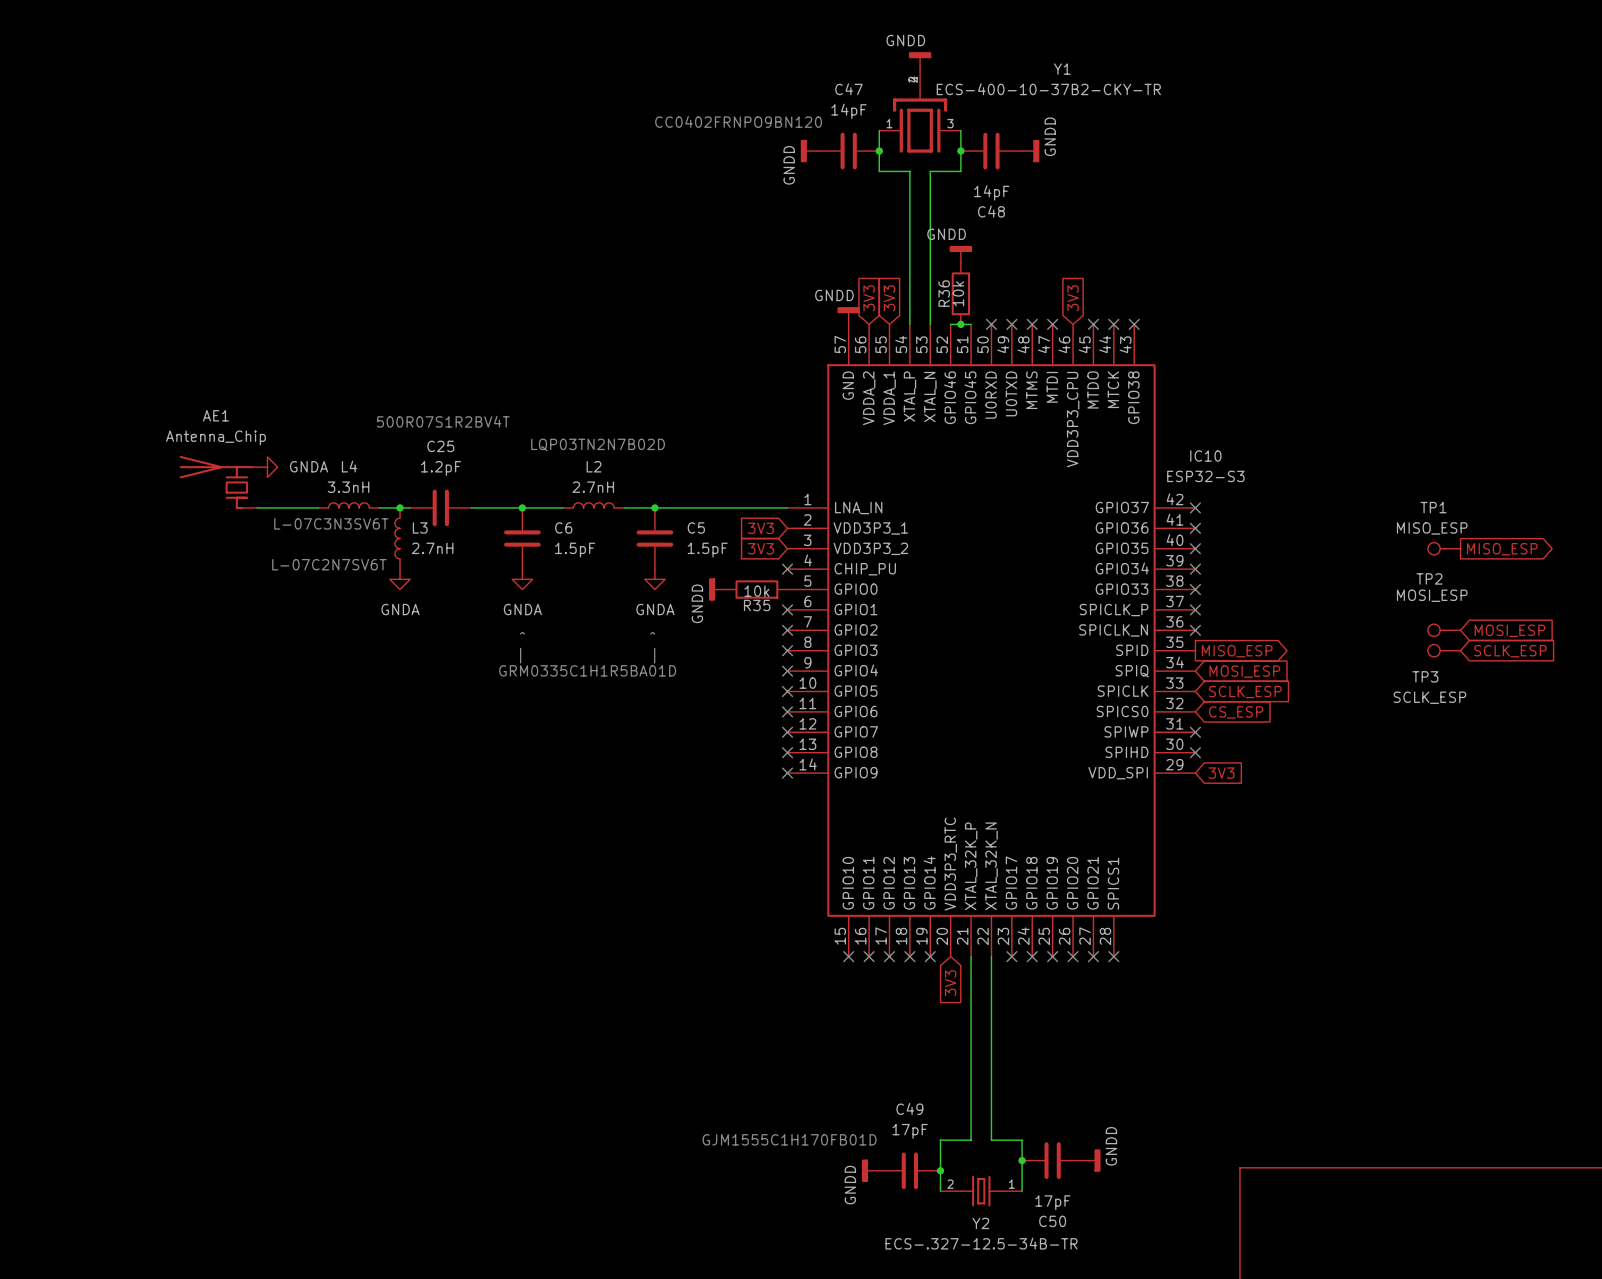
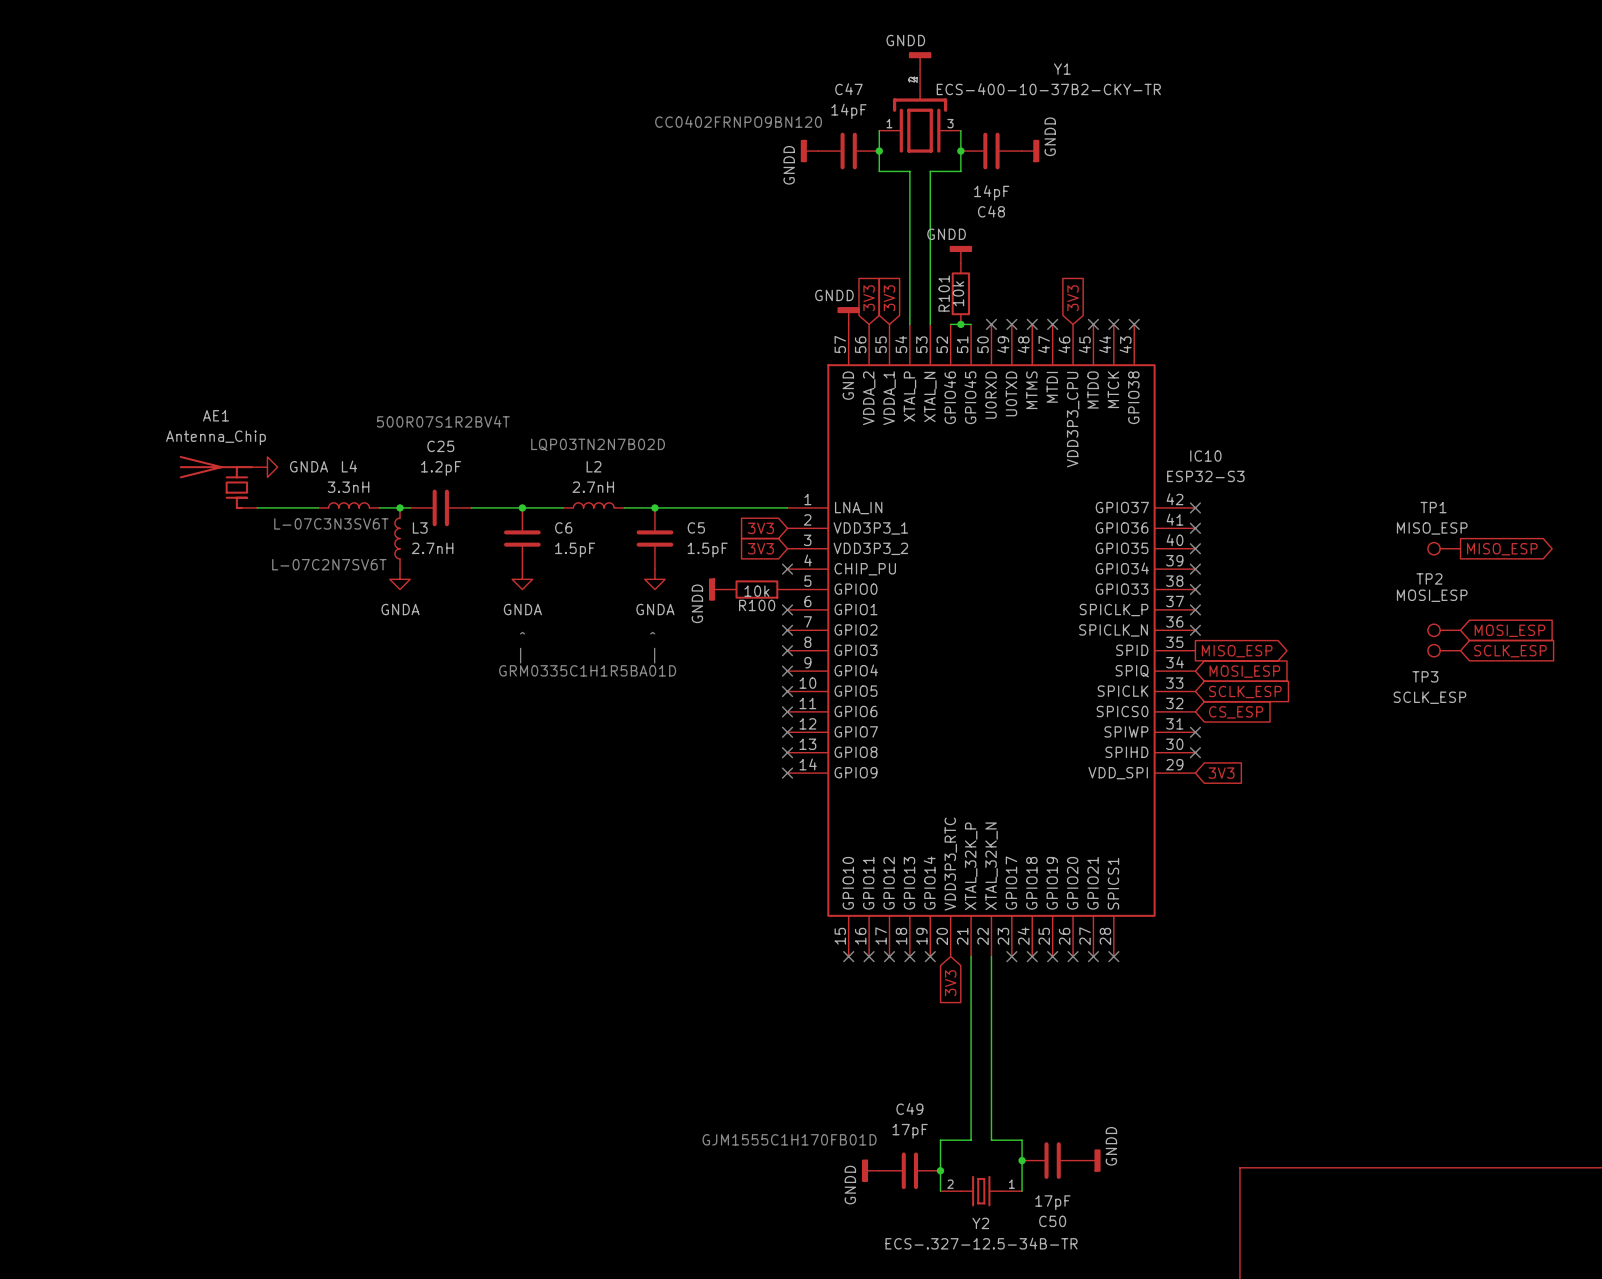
R36 name: R36 (944, 293) -> R101 (944, 293)
R35 name: R35 (757, 605) -> R100 (757, 605)

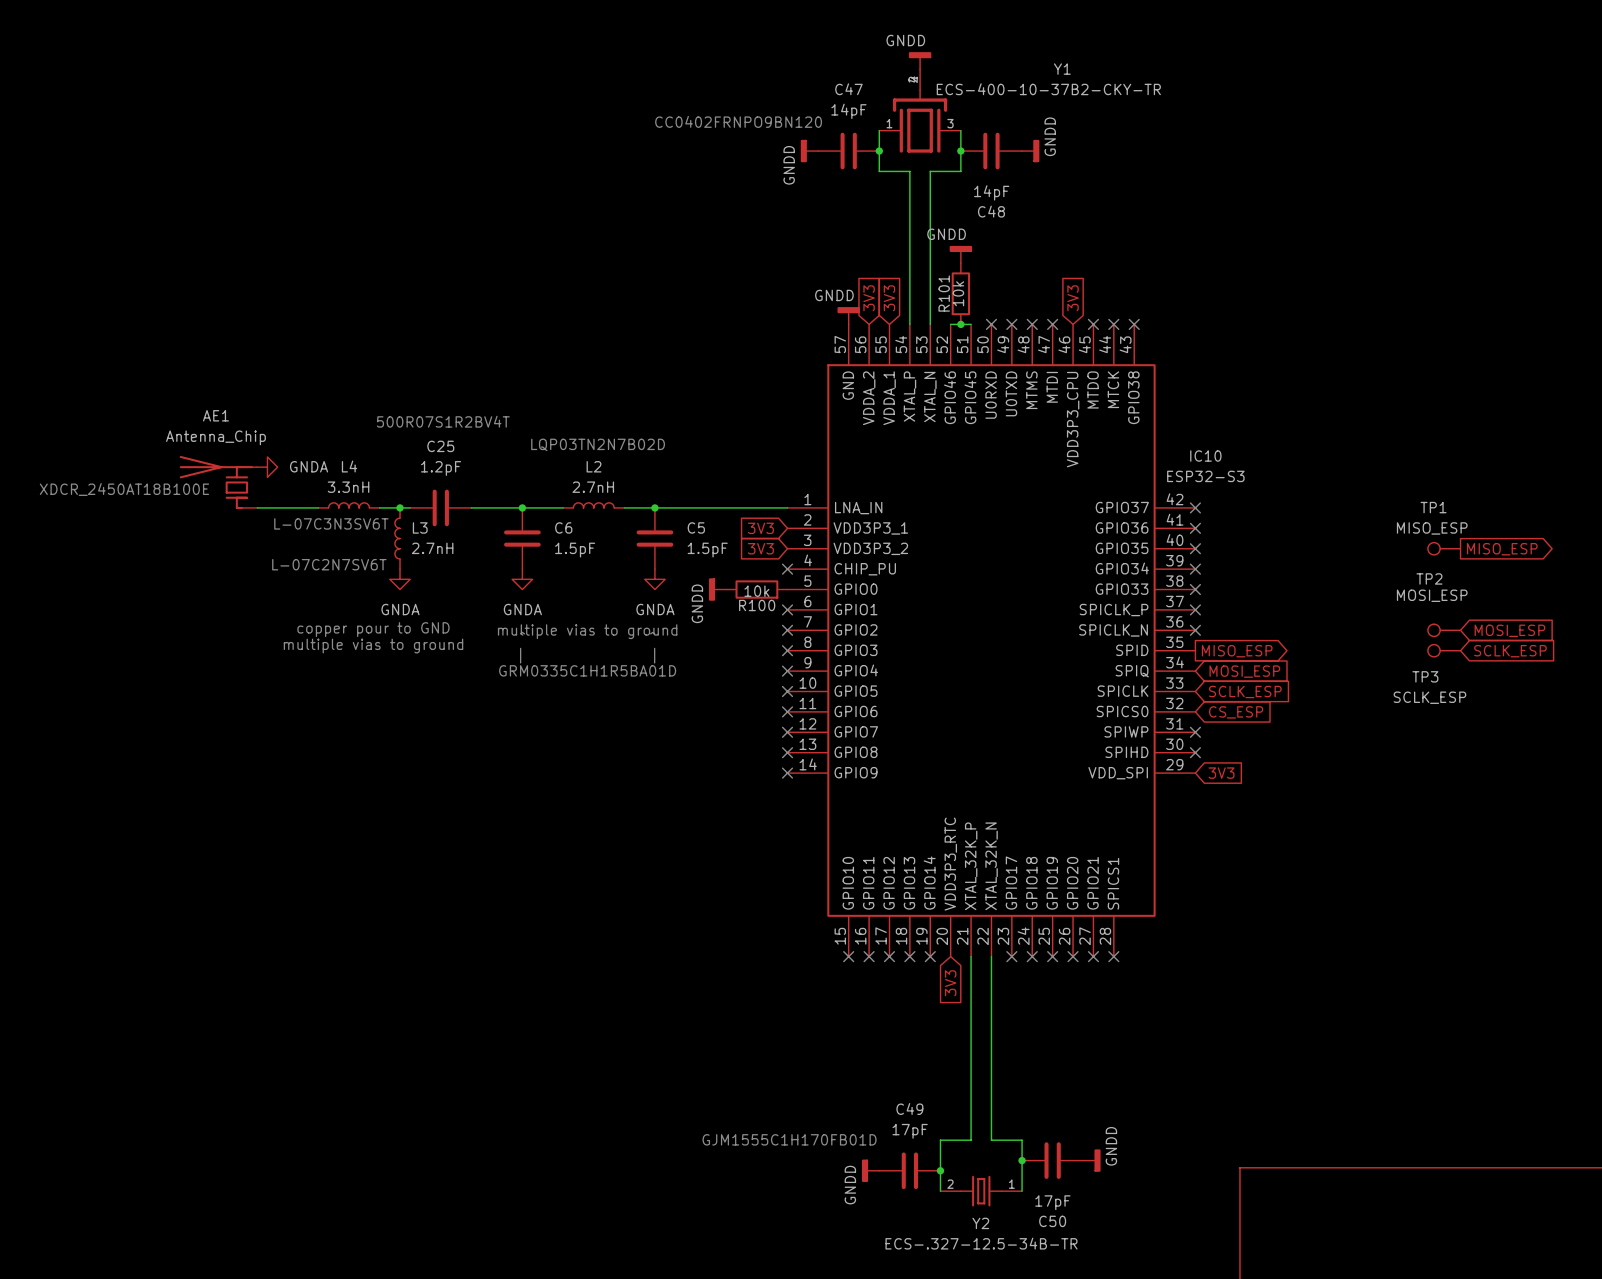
text: none -> XDCR_2450AT18B100E (124, 489)
text: none -> copper pour to GND (373, 629)
text: none -> multiple vias to ground (587, 631)
text: none -> multiple vias to ground (373, 645)

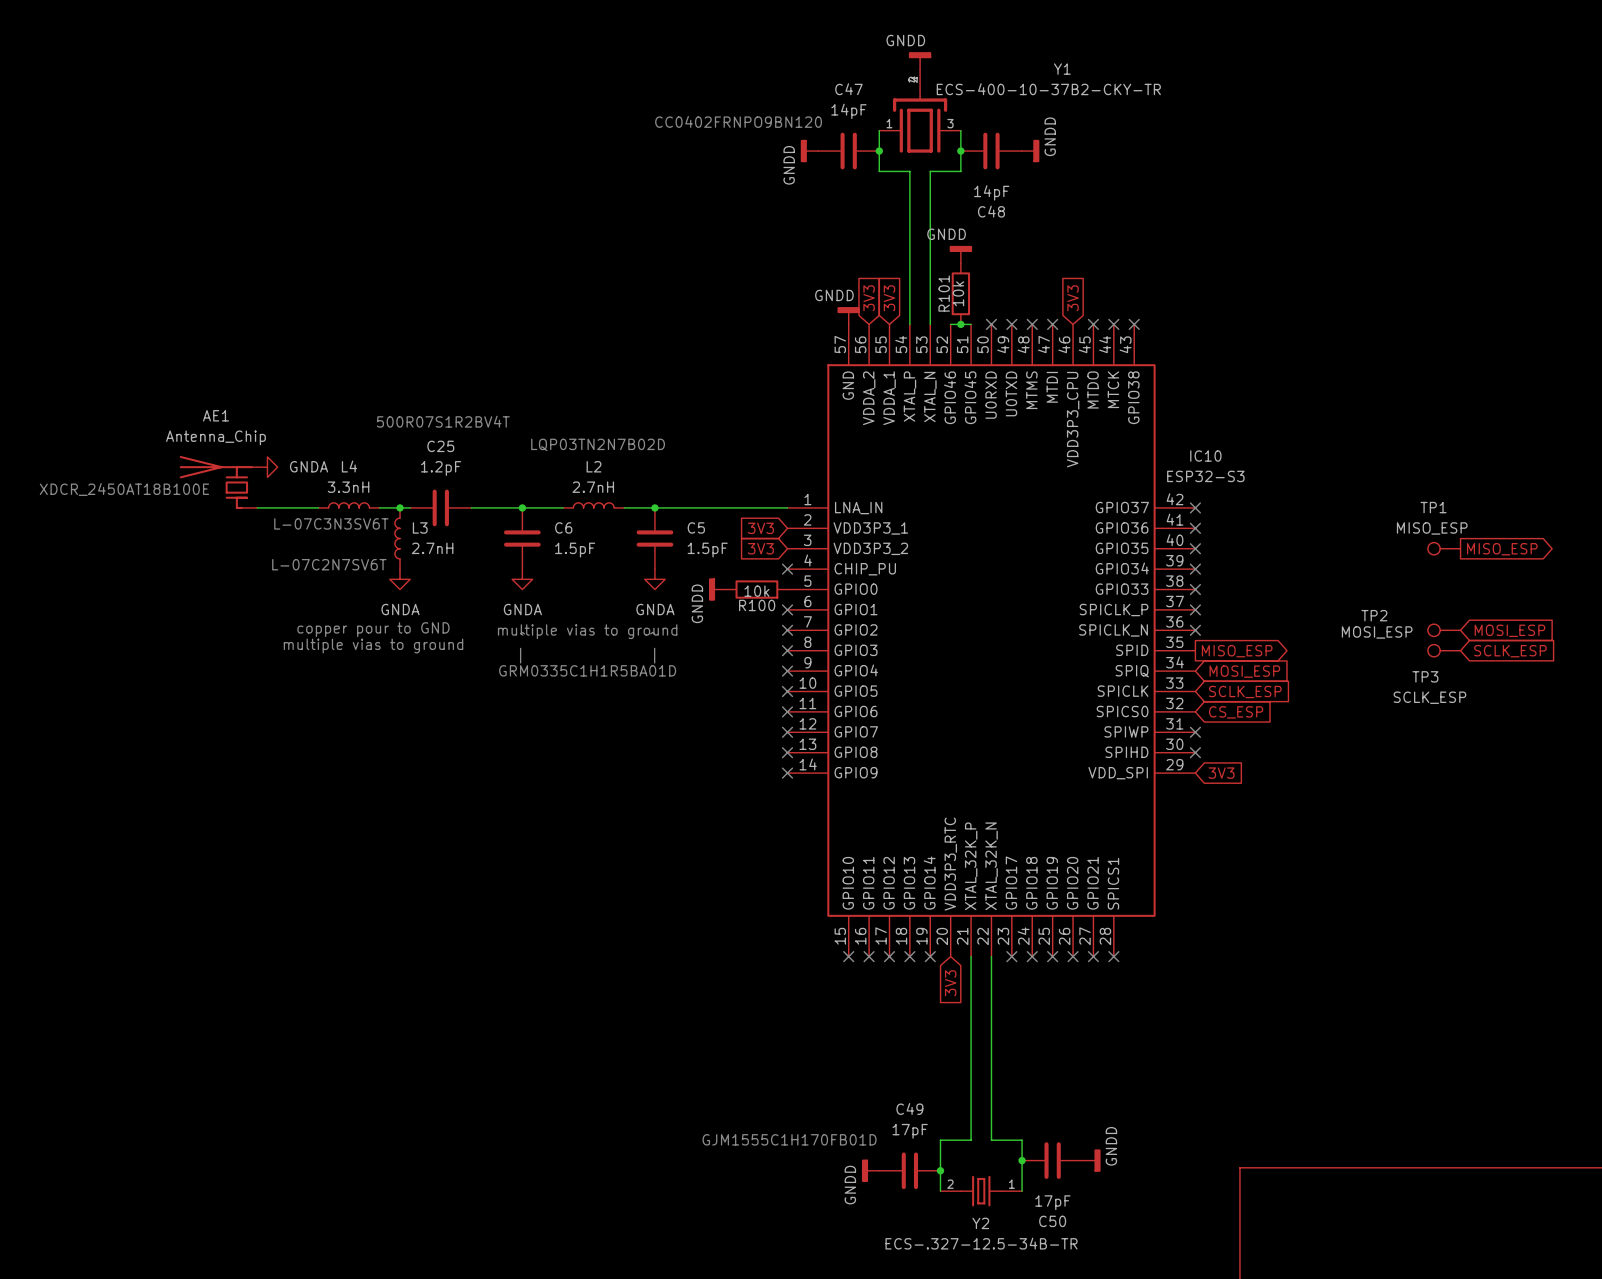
TP2 name position: TP2 (1429, 578) -> TP2 (1374, 615)
TP2 value position: MOSI_ESP (1432, 595) -> MOSI_ESP (1377, 632)

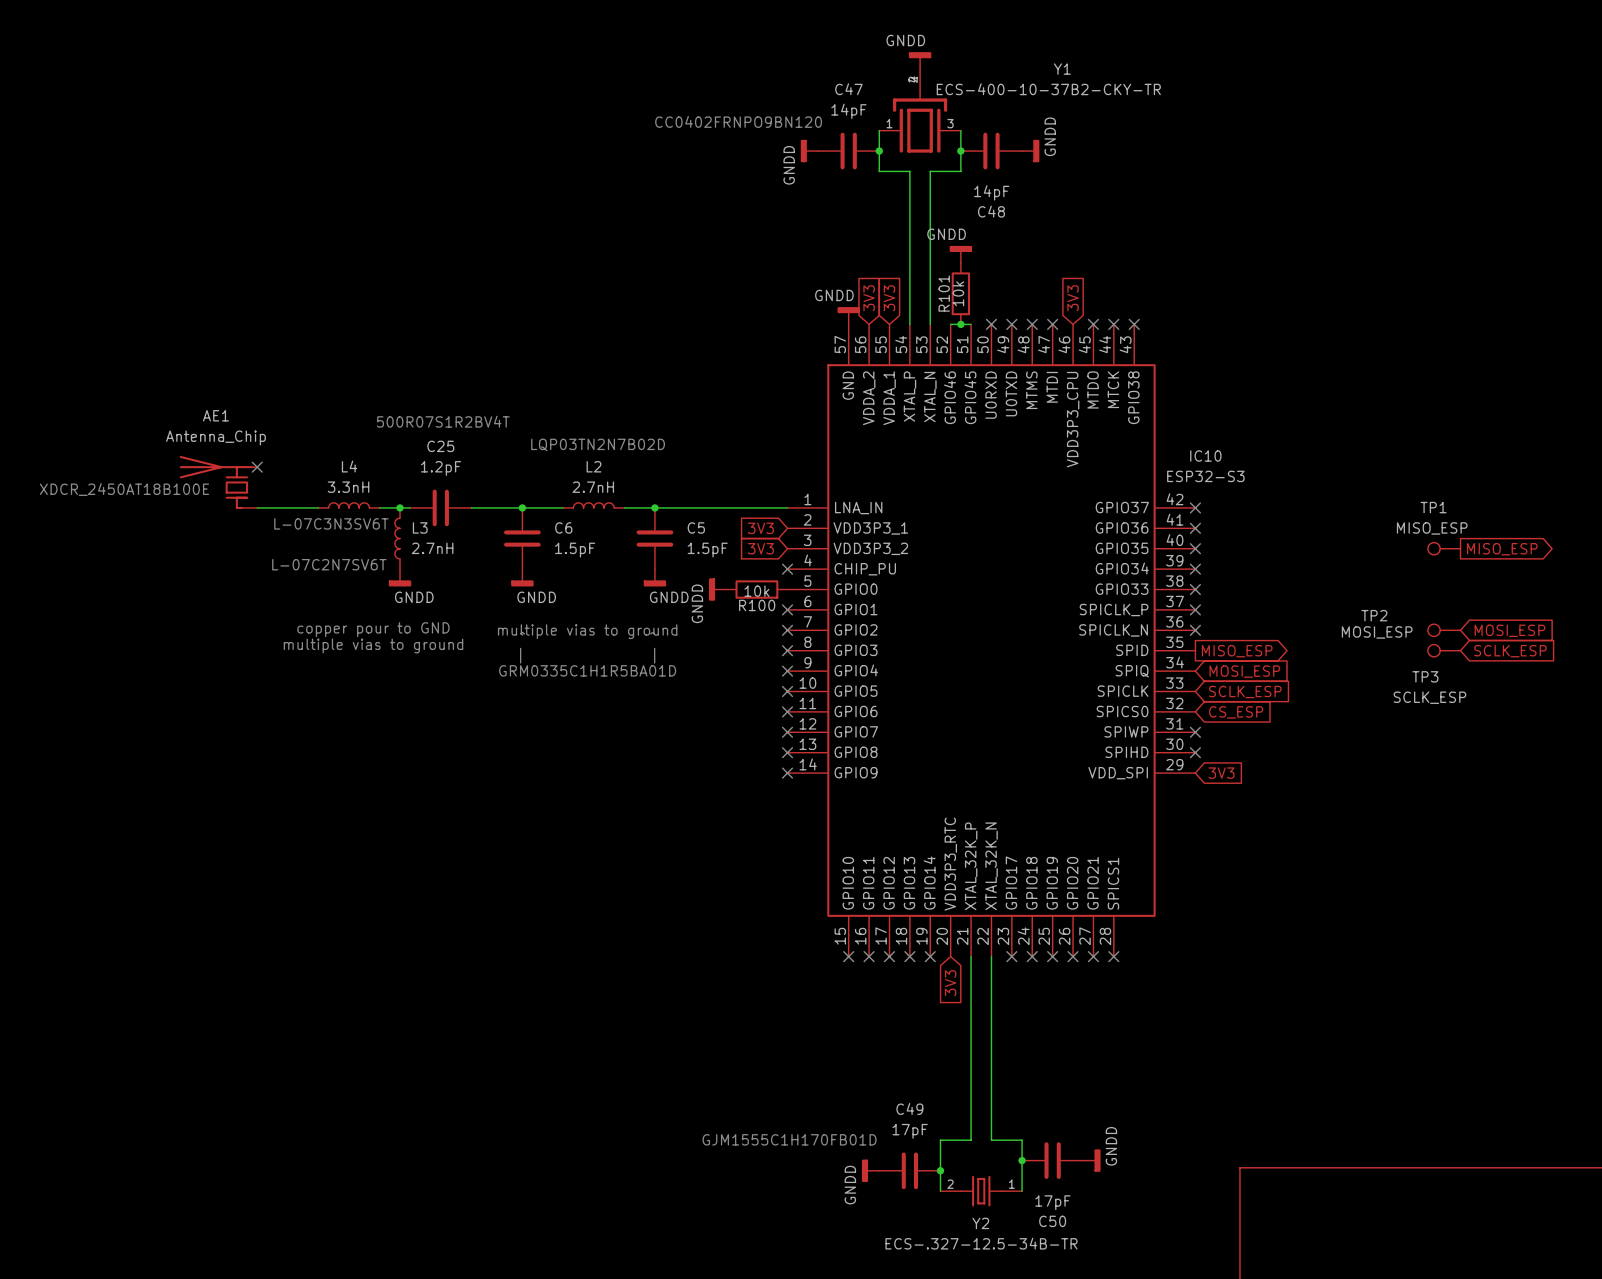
no-connect mark: none -> (257, 467)
power symbol: GNDA (267, 467) -> none
power symbol: GNDA (400, 579) -> GNDD (400, 577)
power symbol: GNDA (522, 579) -> GNDD (522, 577)
power symbol: GNDA (654, 579) -> GNDD (654, 577)

